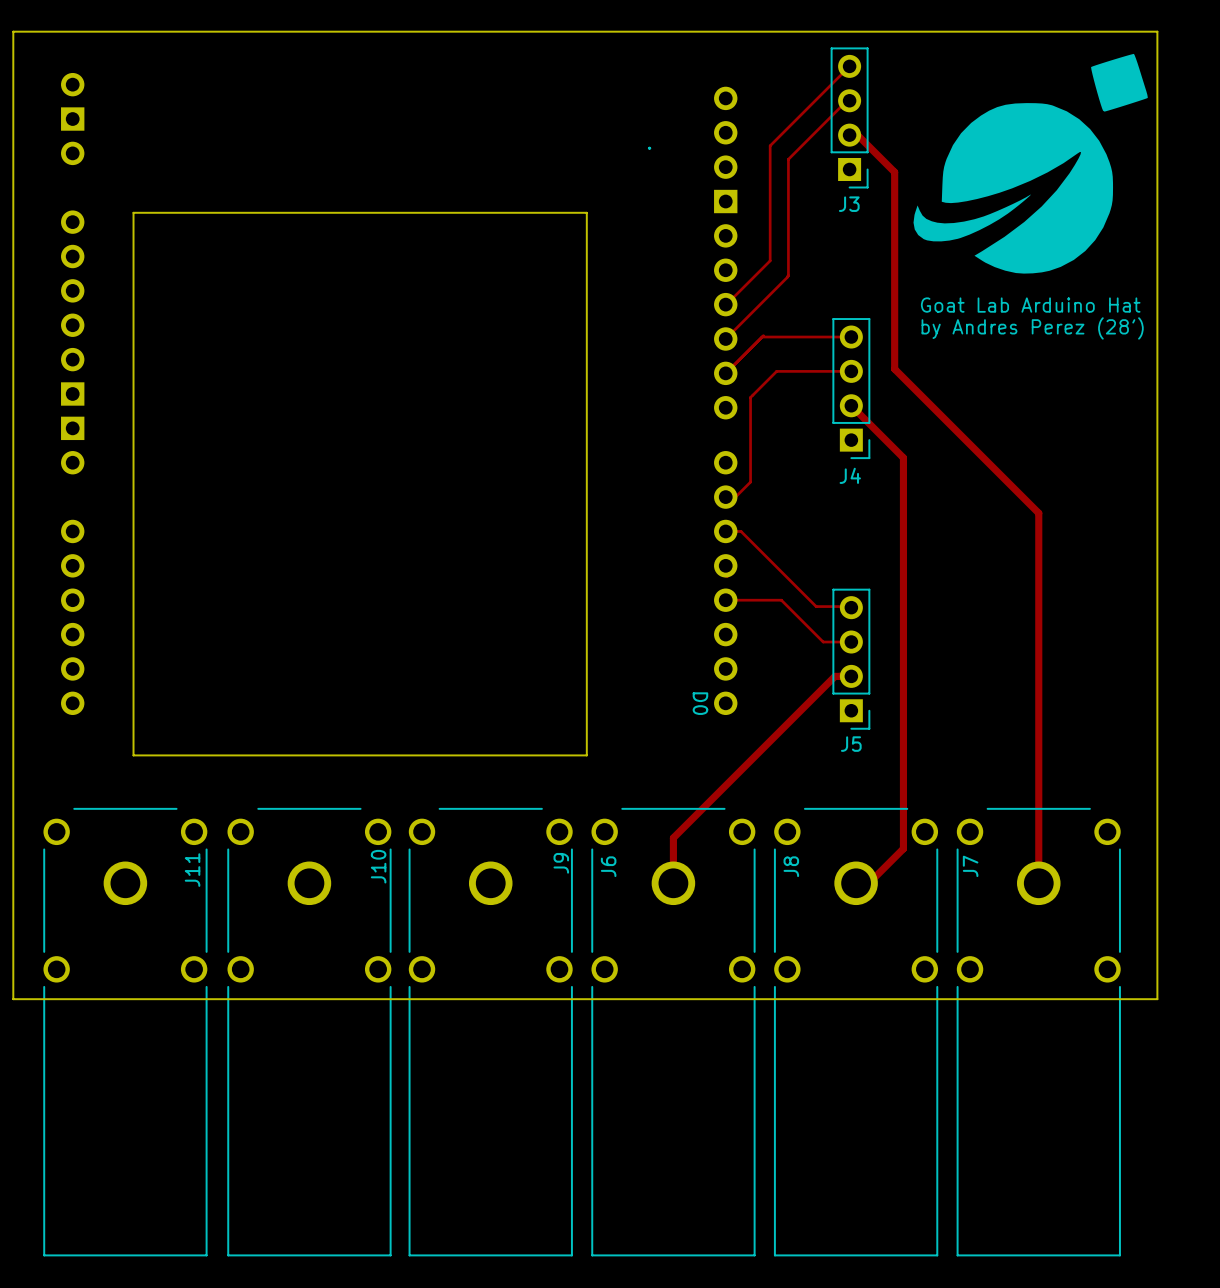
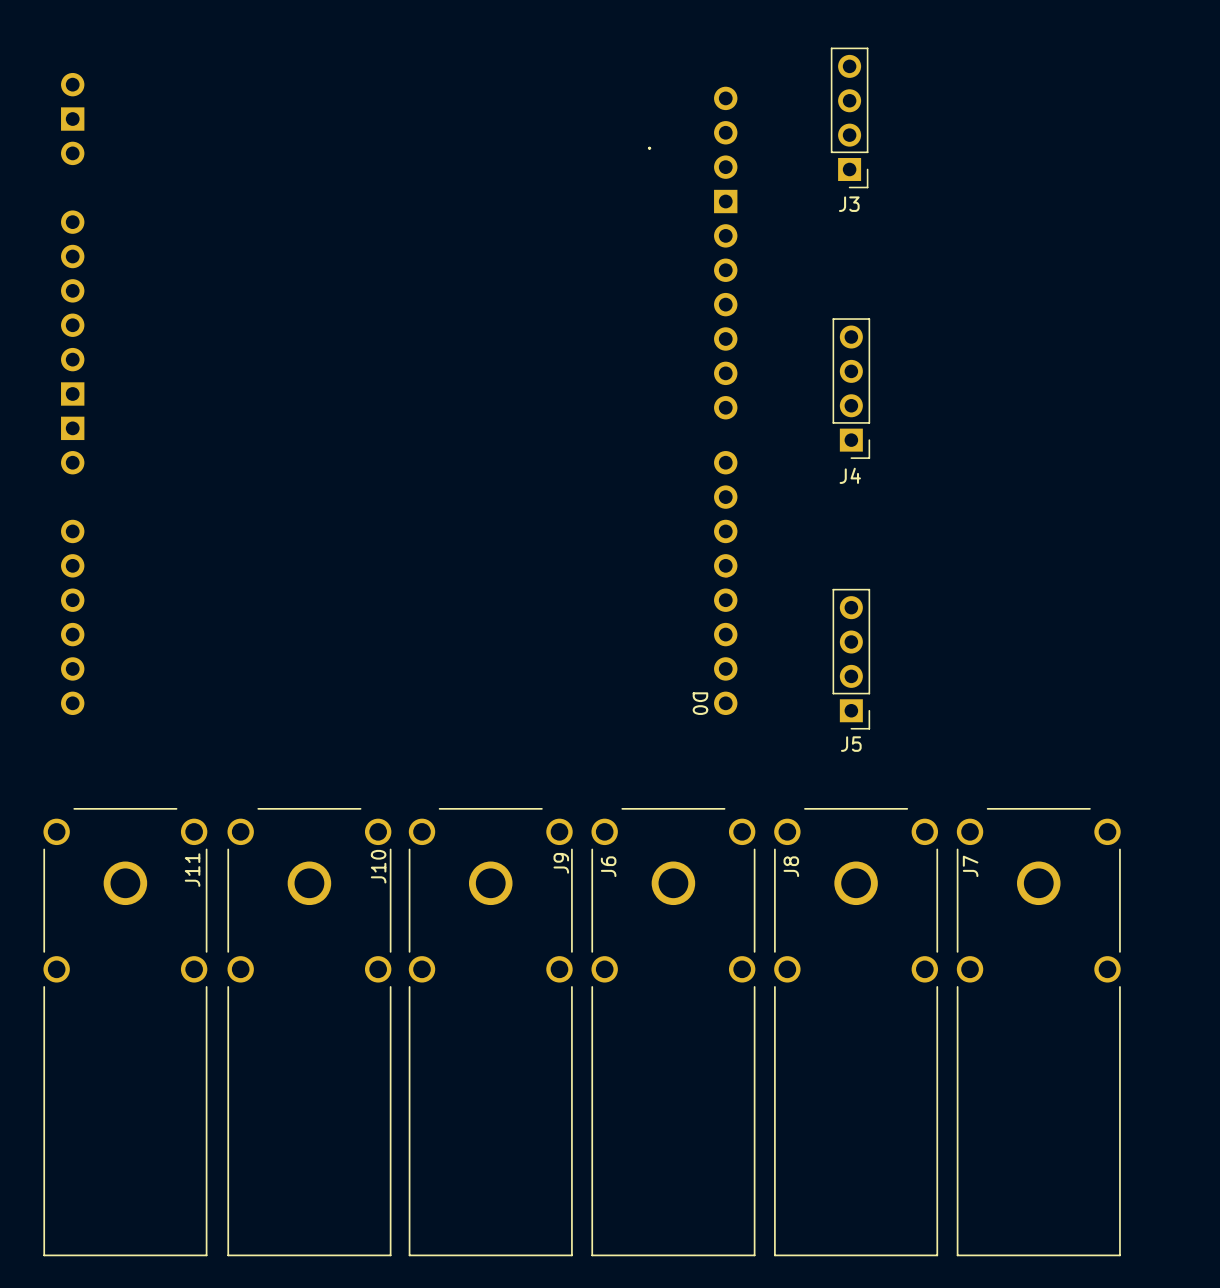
board edge: (13, 31) (1157, 31) (1157, 999) (13, 999) (13, 31) -> none
track: (849, 66) (770, 145) (770, 260) (725, 304) -> none
track: (849, 100) (847, 100) (788, 159) (788, 275) (725, 338) -> none
track: (849, 135) (857, 135) (894, 172) (894, 369) (1038, 513) (1038, 883) -> none
part: (1030, 163) -> none
board edge: (133, 212) (586, 212) (586, 755) (133, 755) (133, 212) -> none
text: Goat Lab Arduino Hat (1030, 305) -> none
text: by Andres Perez (28') (1032, 328) -> none
track: (763, 335) (725, 373) -> none
track: (762, 337) (851, 337) -> none
track: (851, 371) (776, 371) (750, 397) (750, 482) (735, 497) (725, 496) -> none
track: (852, 404) (851, 405) (903, 457) (903, 848) (868, 883) (856, 883) (856, 870) -> none
track: (725, 531) (741, 531) (816, 606) (850, 606) -> none
track: (725, 600) (781, 600) (823, 642) (851, 642) -> none
track: (851, 676) (834, 676) (673, 837) (673, 883) -> none

